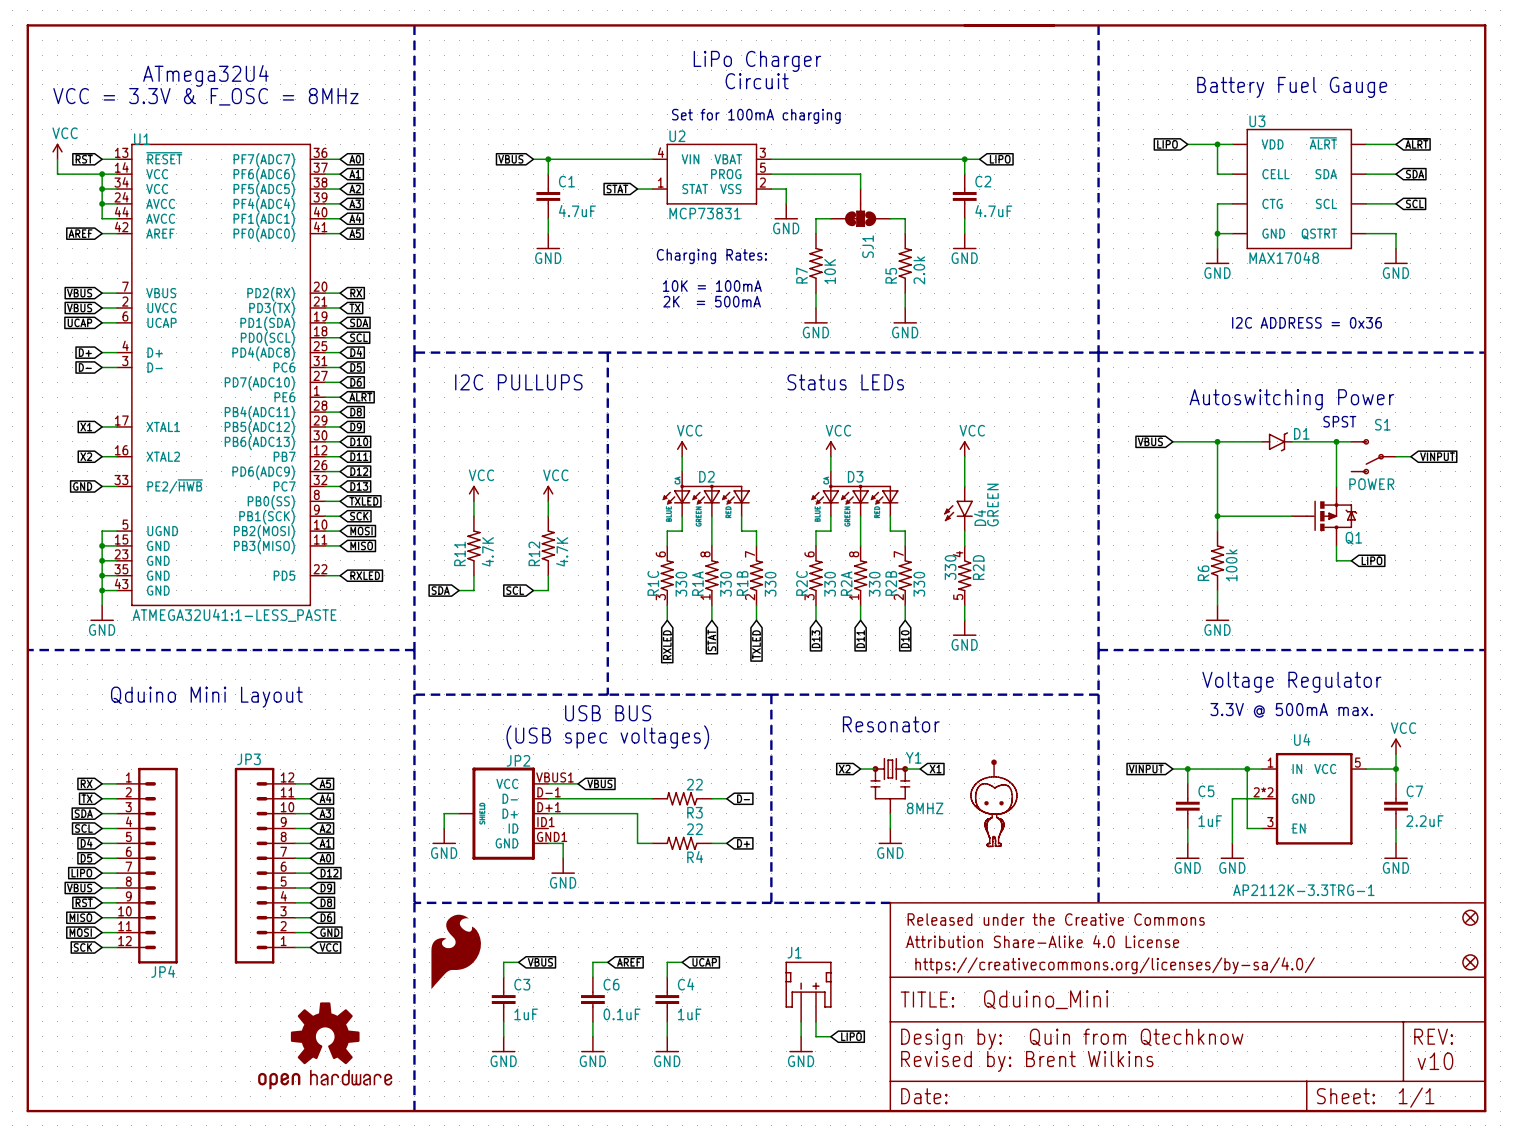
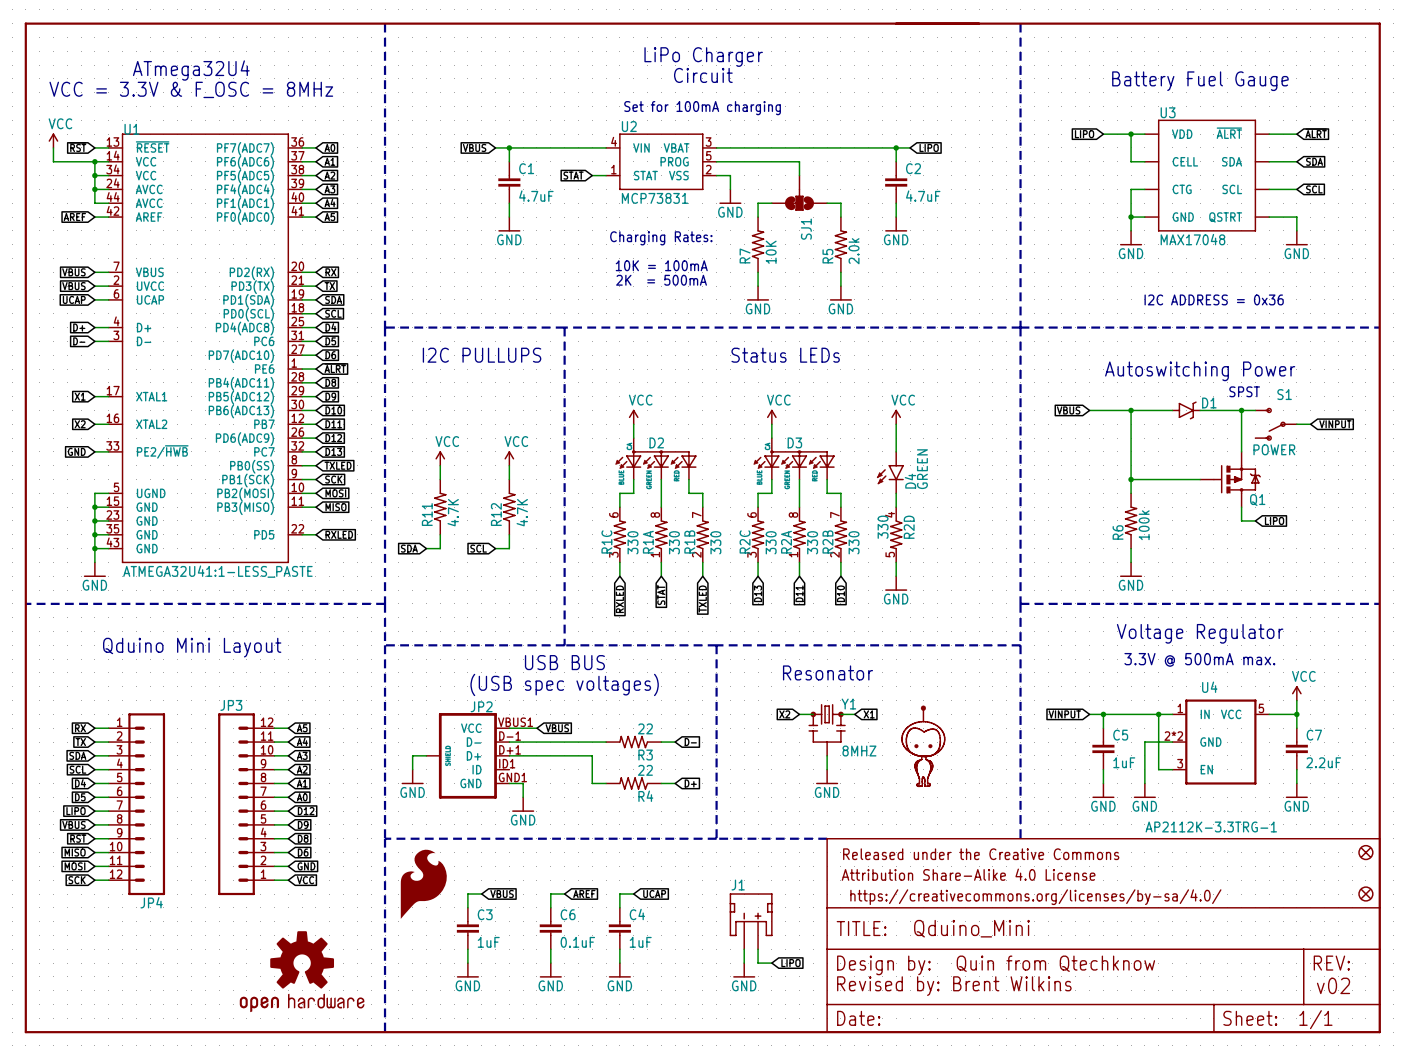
text: v10 (1435, 1061) -> v02 (1333, 985)

